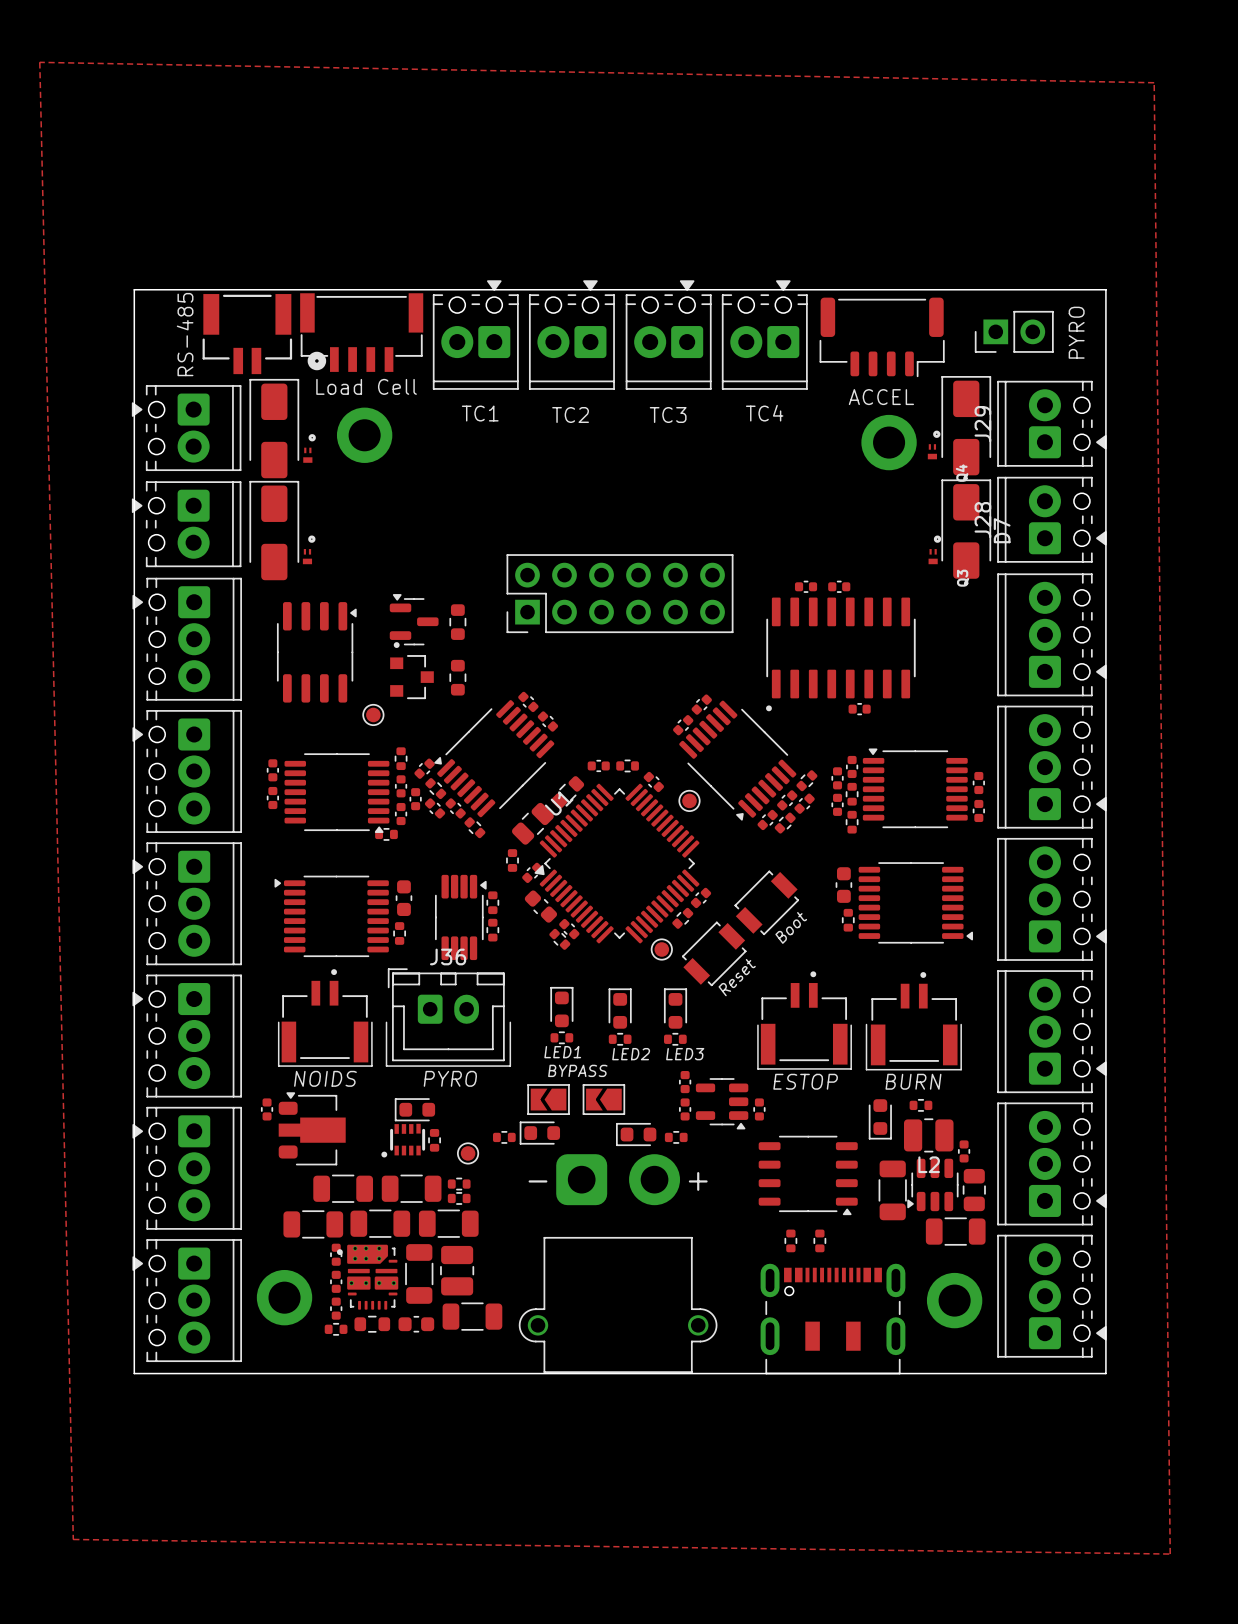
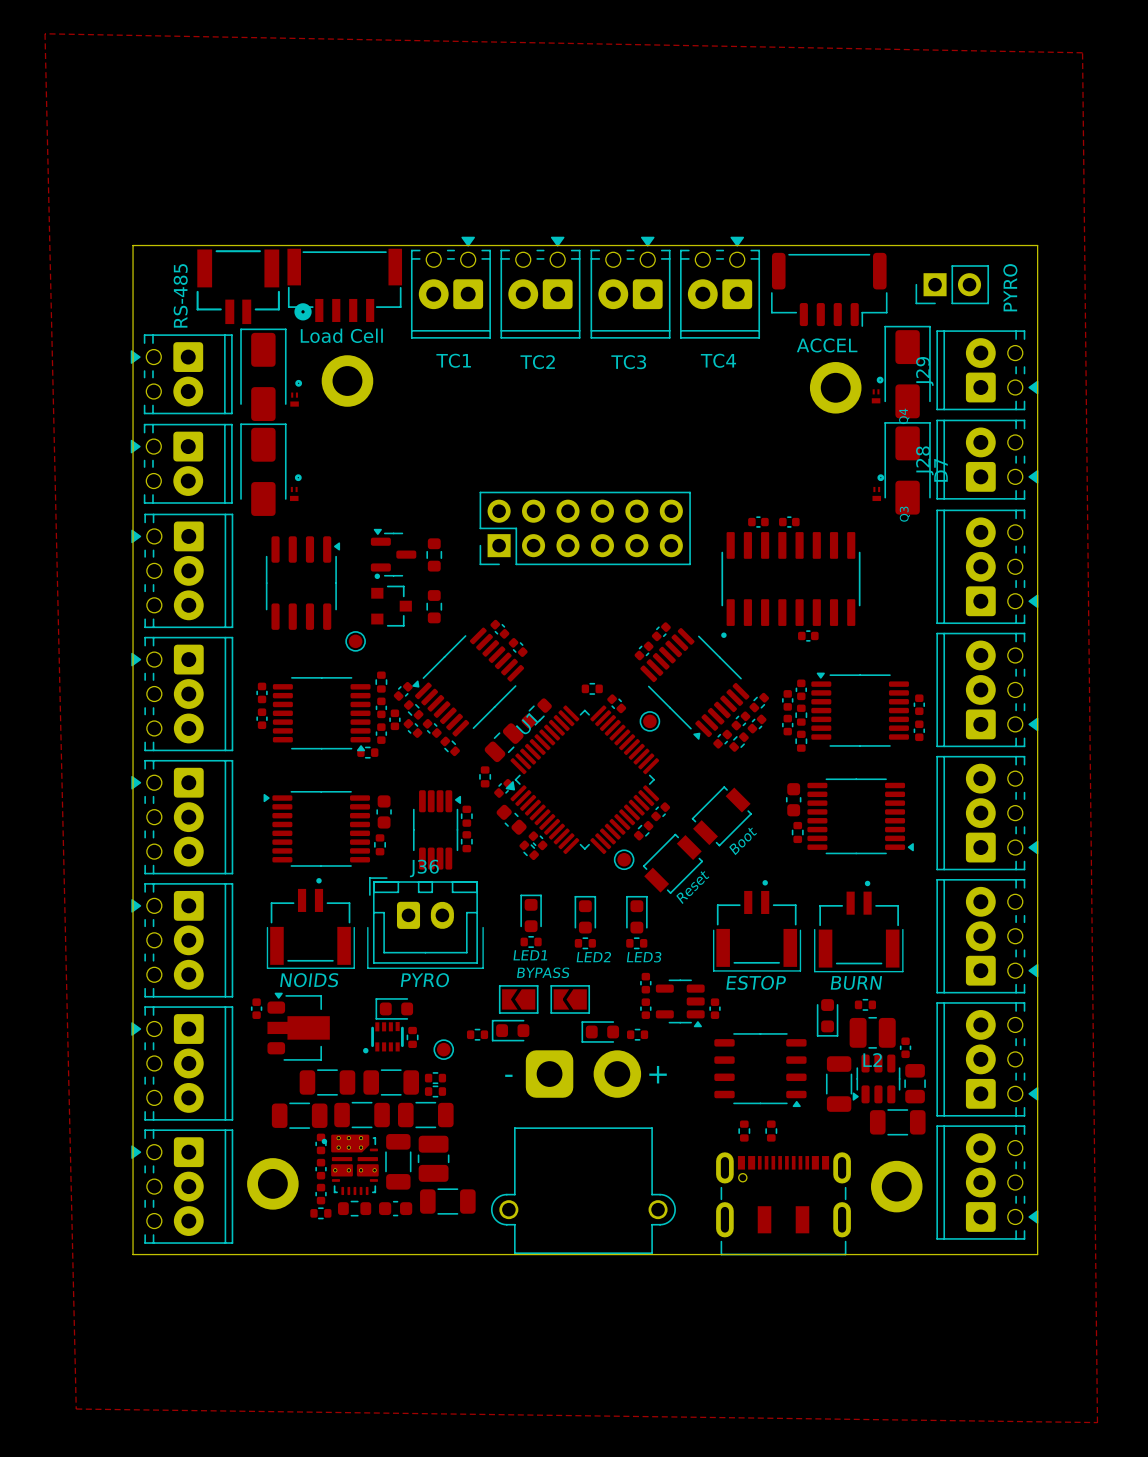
part: (598, 765) -> none

